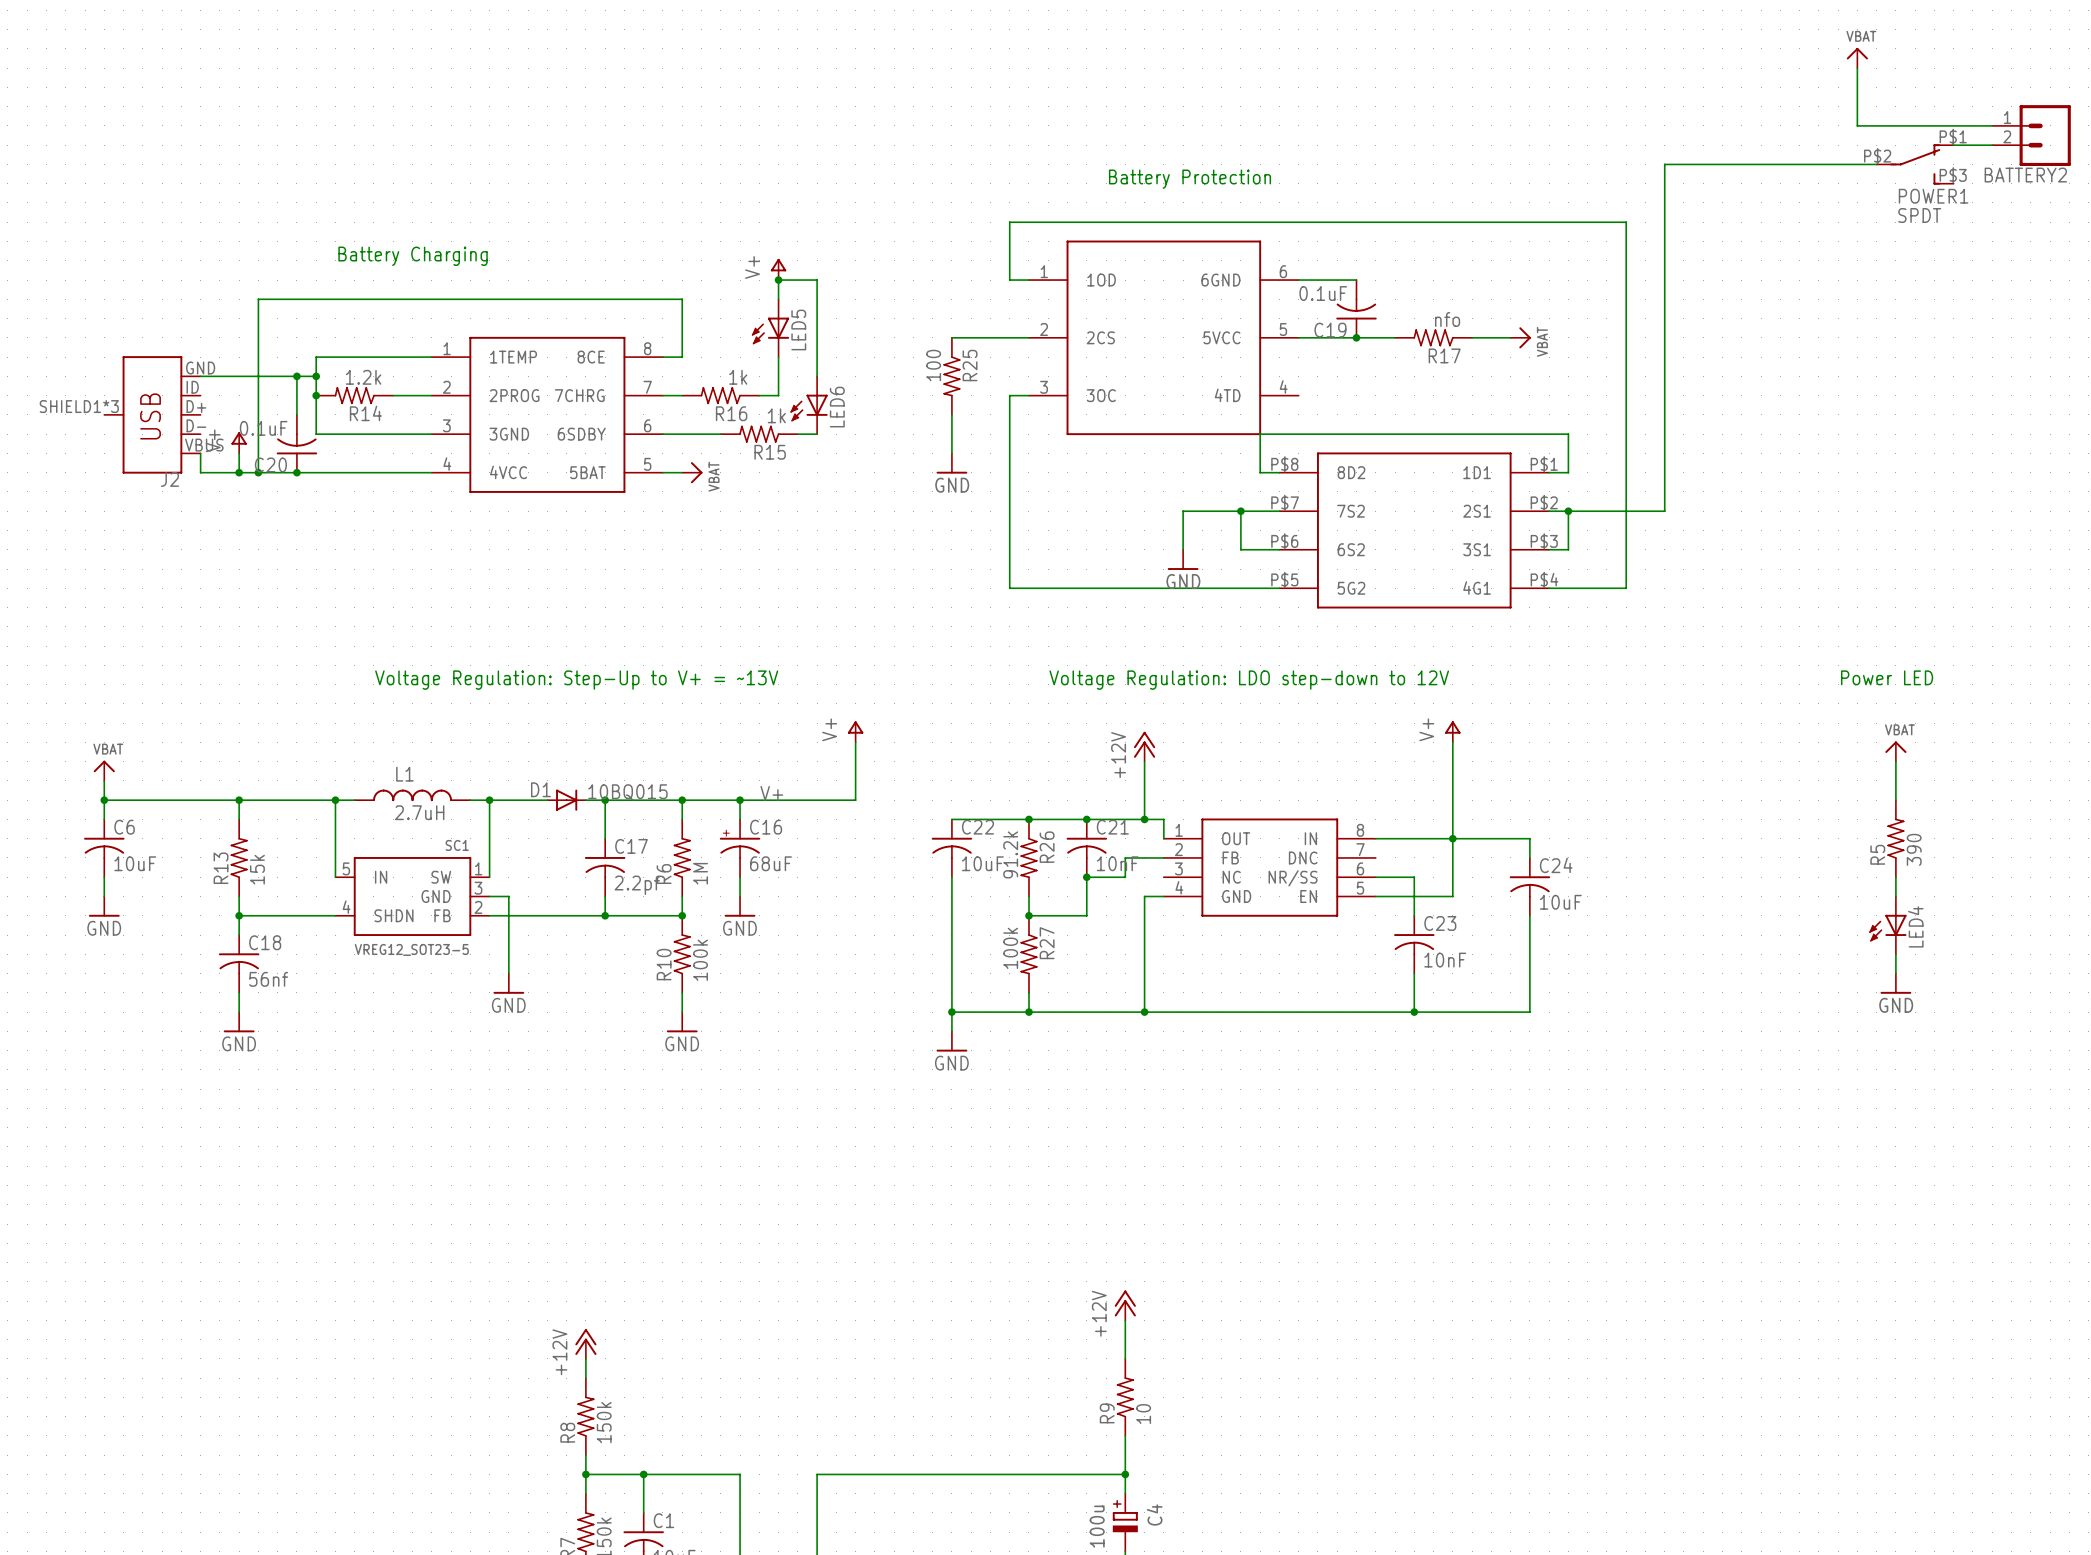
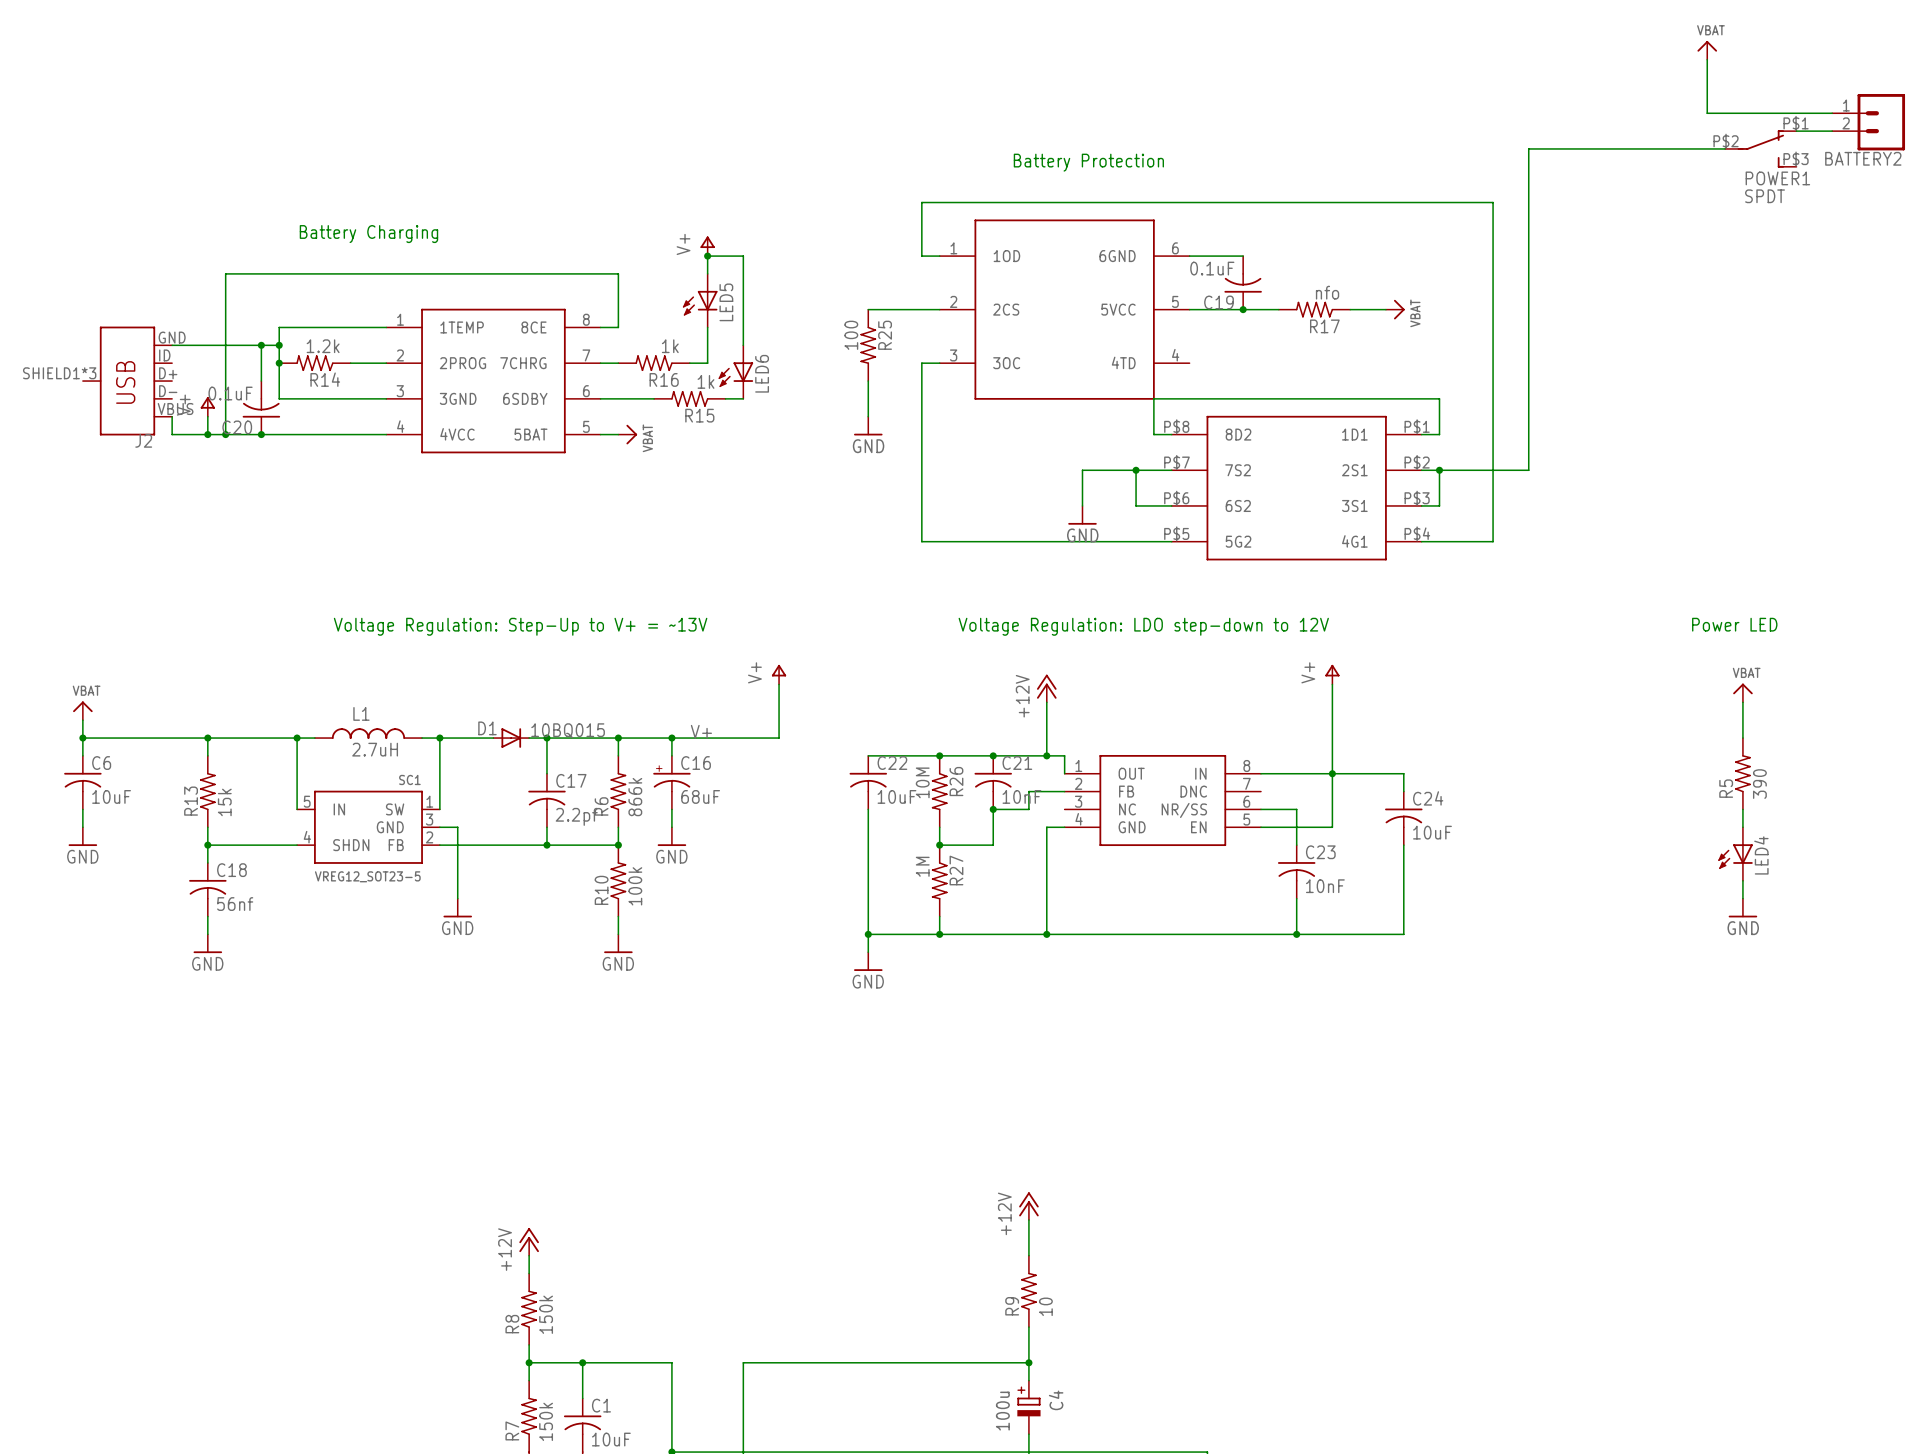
R26 value: 91.2k (1010, 854) -> 10M (922, 782)
R6 value: 1M (700, 873) -> 866k (635, 797)
R27 value: 100k (1010, 948) -> 1M (922, 866)

